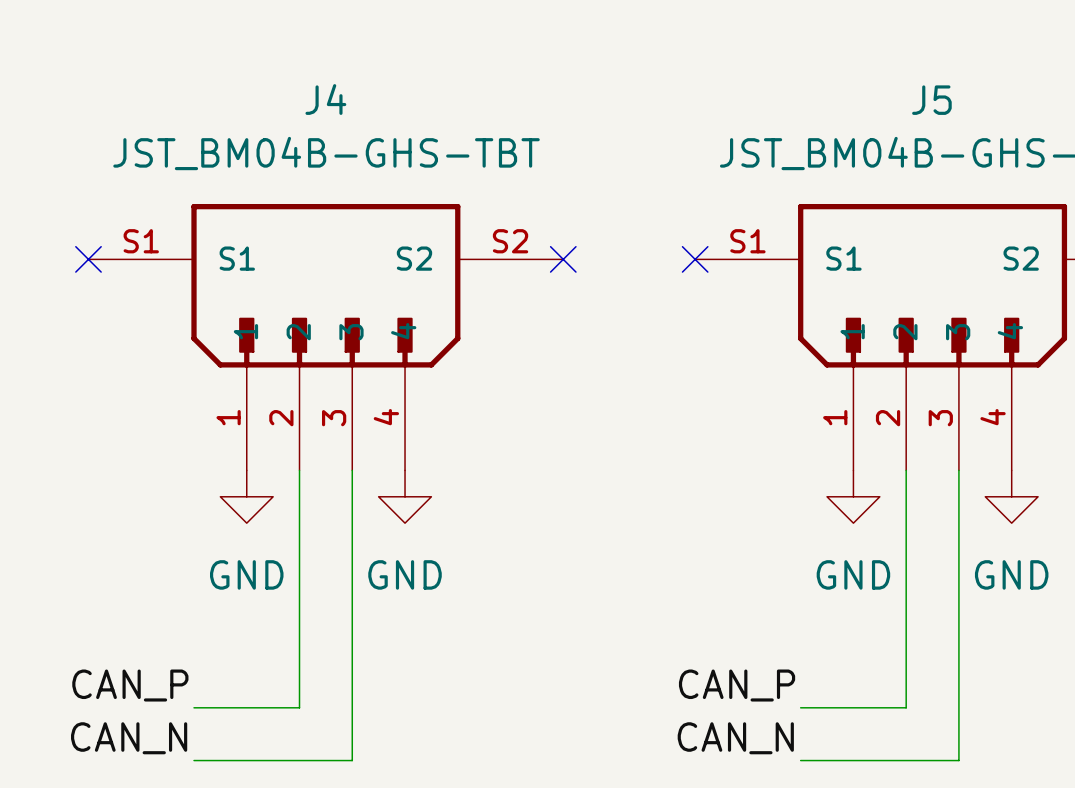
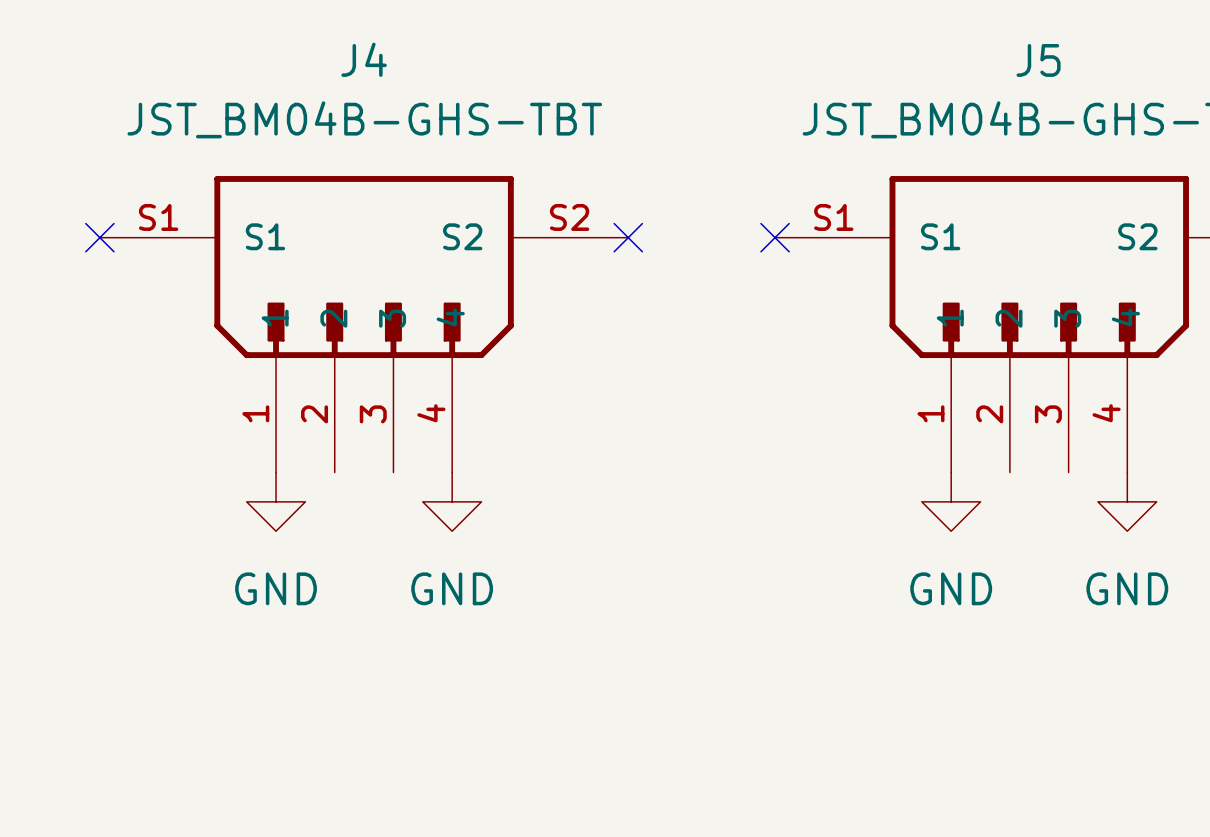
wire: (299, 470) (299, 707) (194, 707) -> none
wire: (352, 470) (352, 760) (194, 760) -> none
wire: (906, 470) (906, 707) (800, 707) -> none
wire: (958, 470) (958, 760) (800, 760) -> none
label: CAN_P (130, 685) -> none
label: CAN_P (737, 685) -> none
label: CAN_N (129, 738) -> none
label: CAN_N (735, 738) -> none

